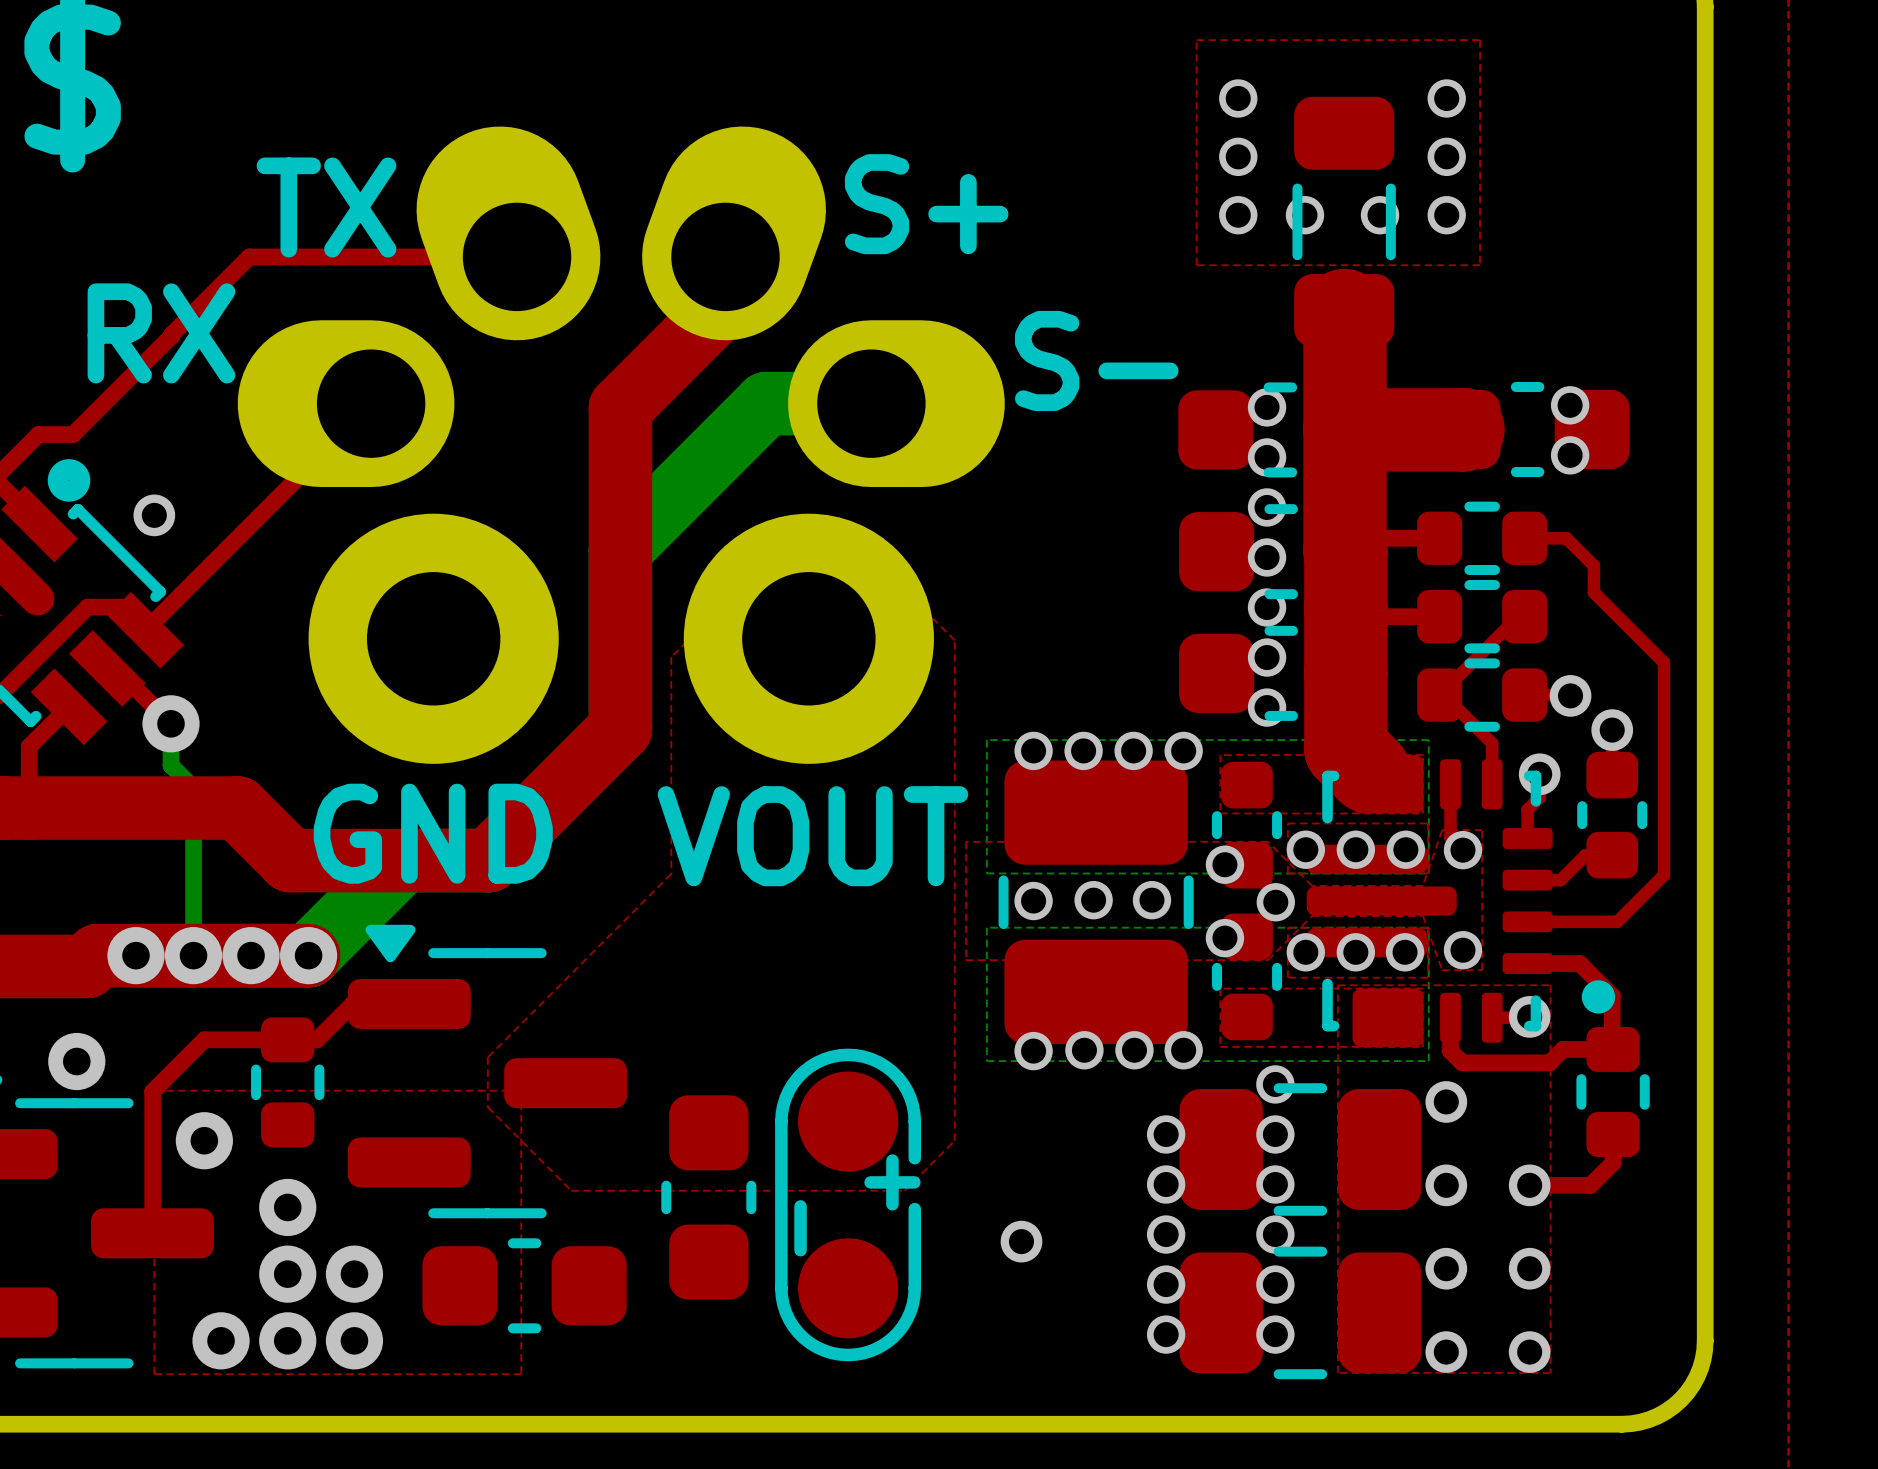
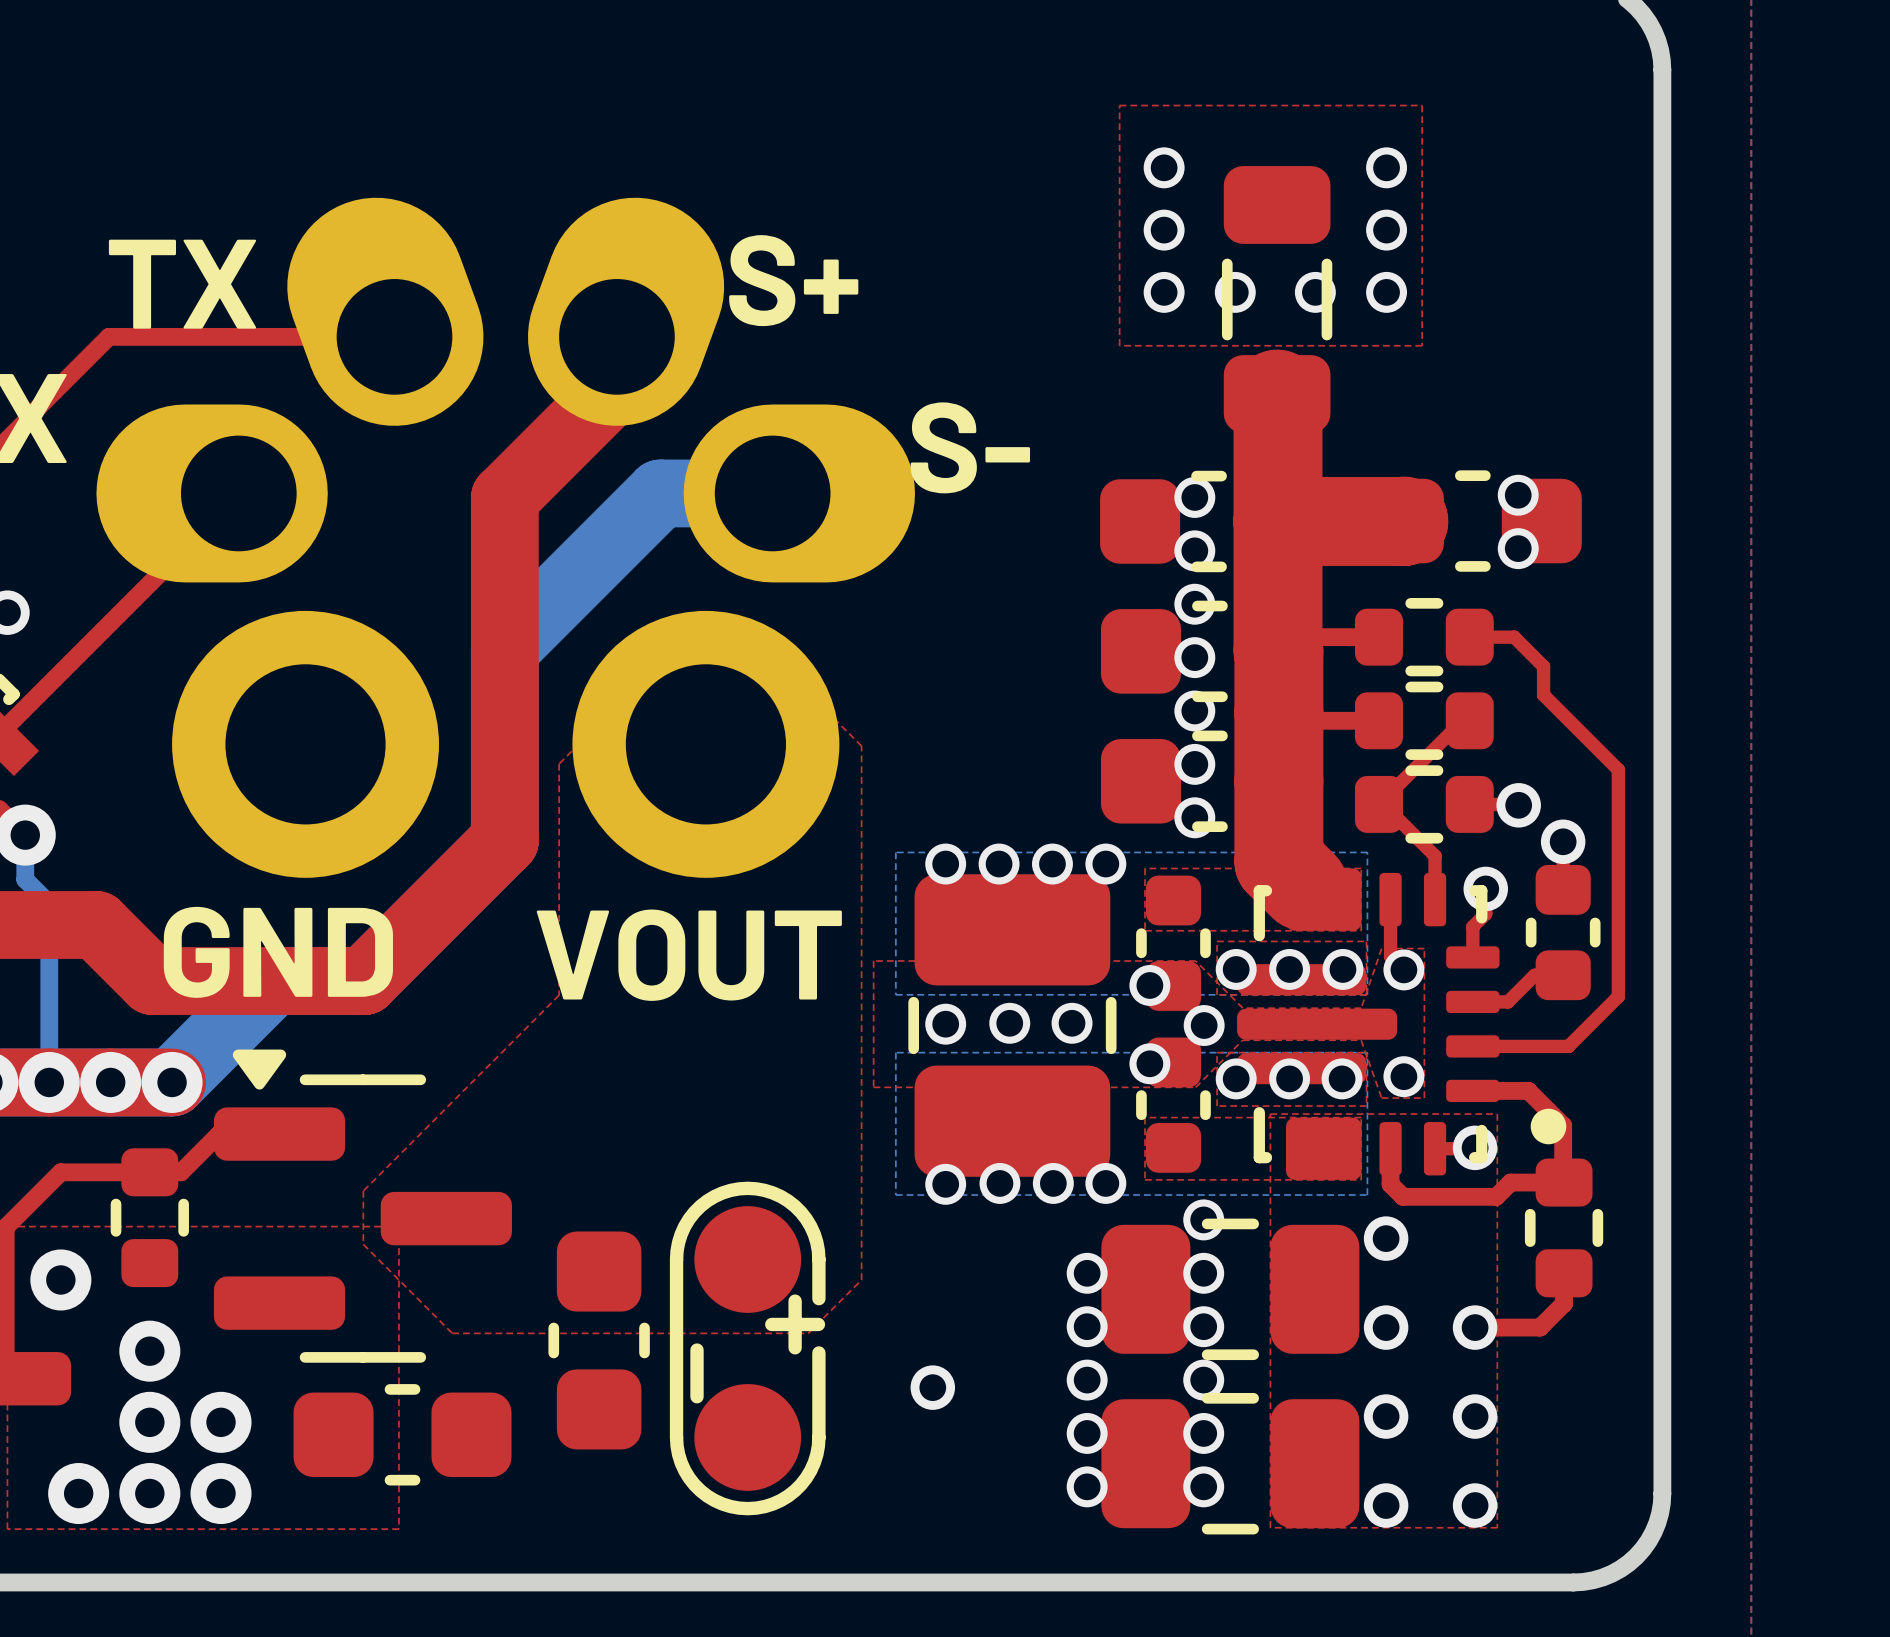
part footprint: [237, 126, 1005, 764] -> [96, 197, 916, 878]

